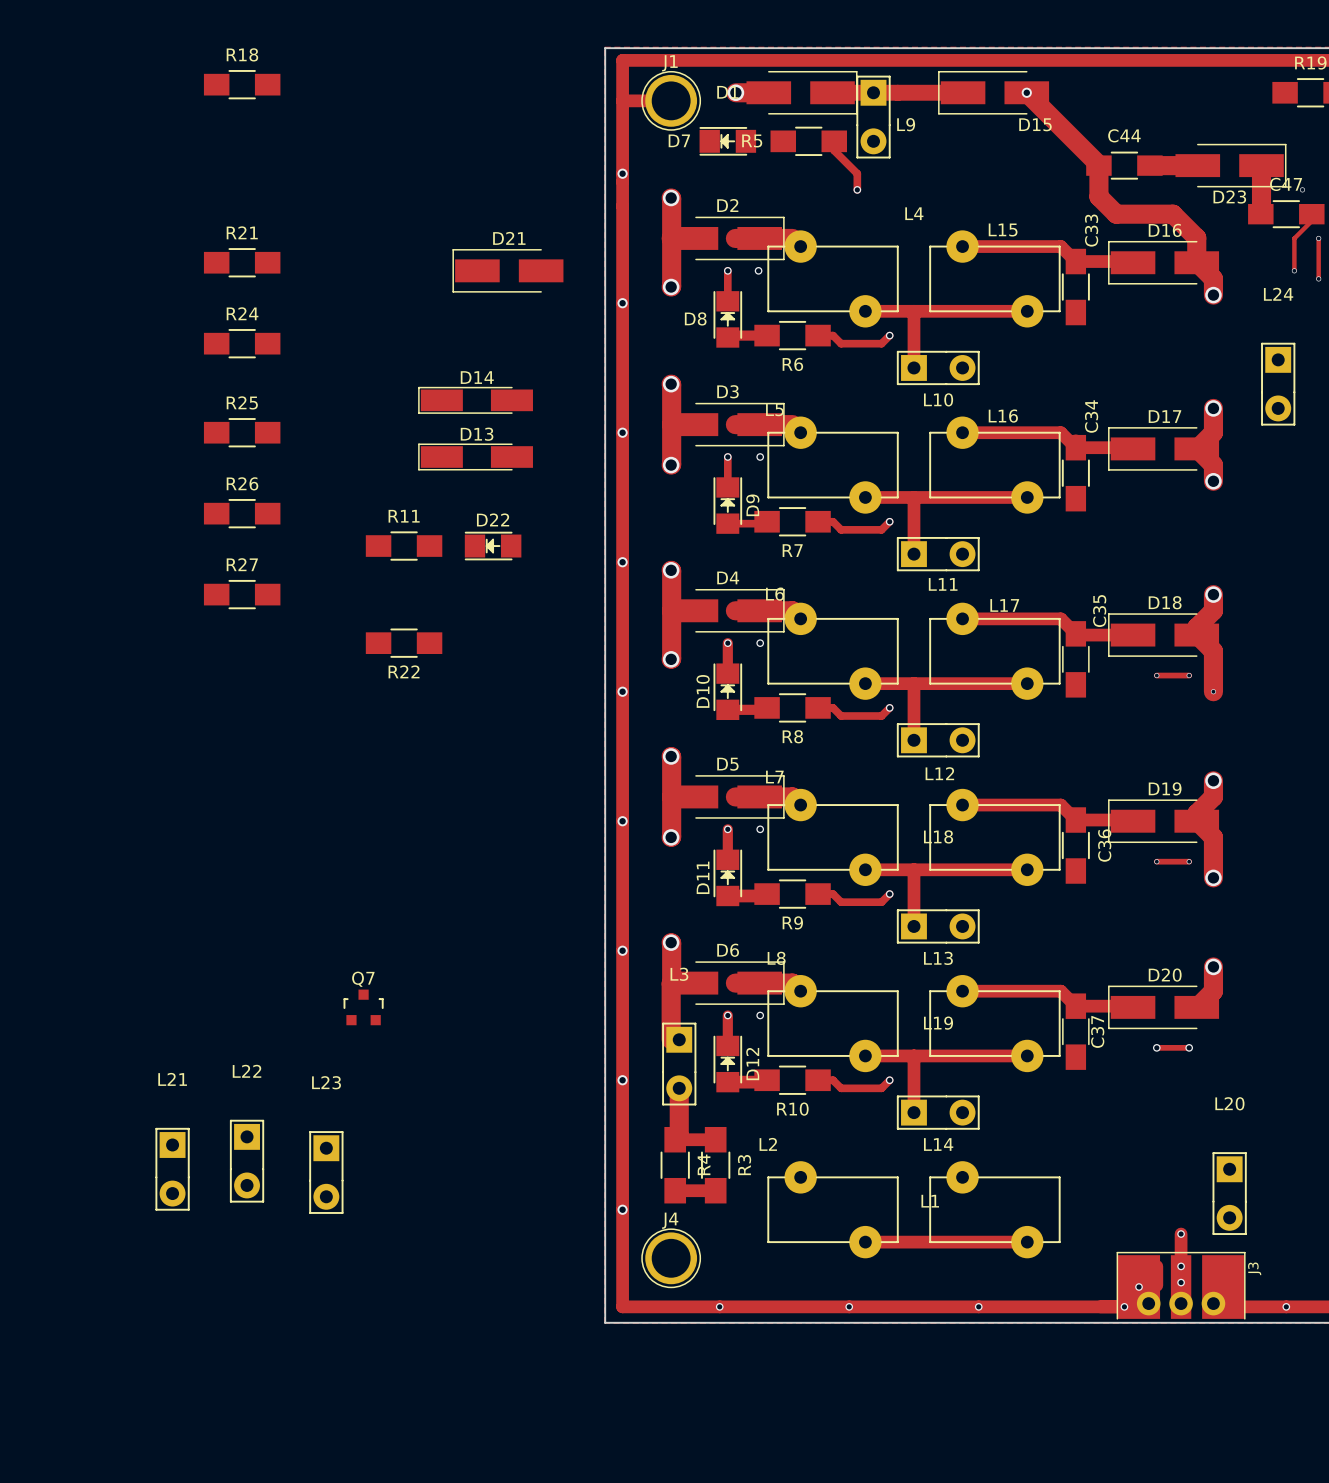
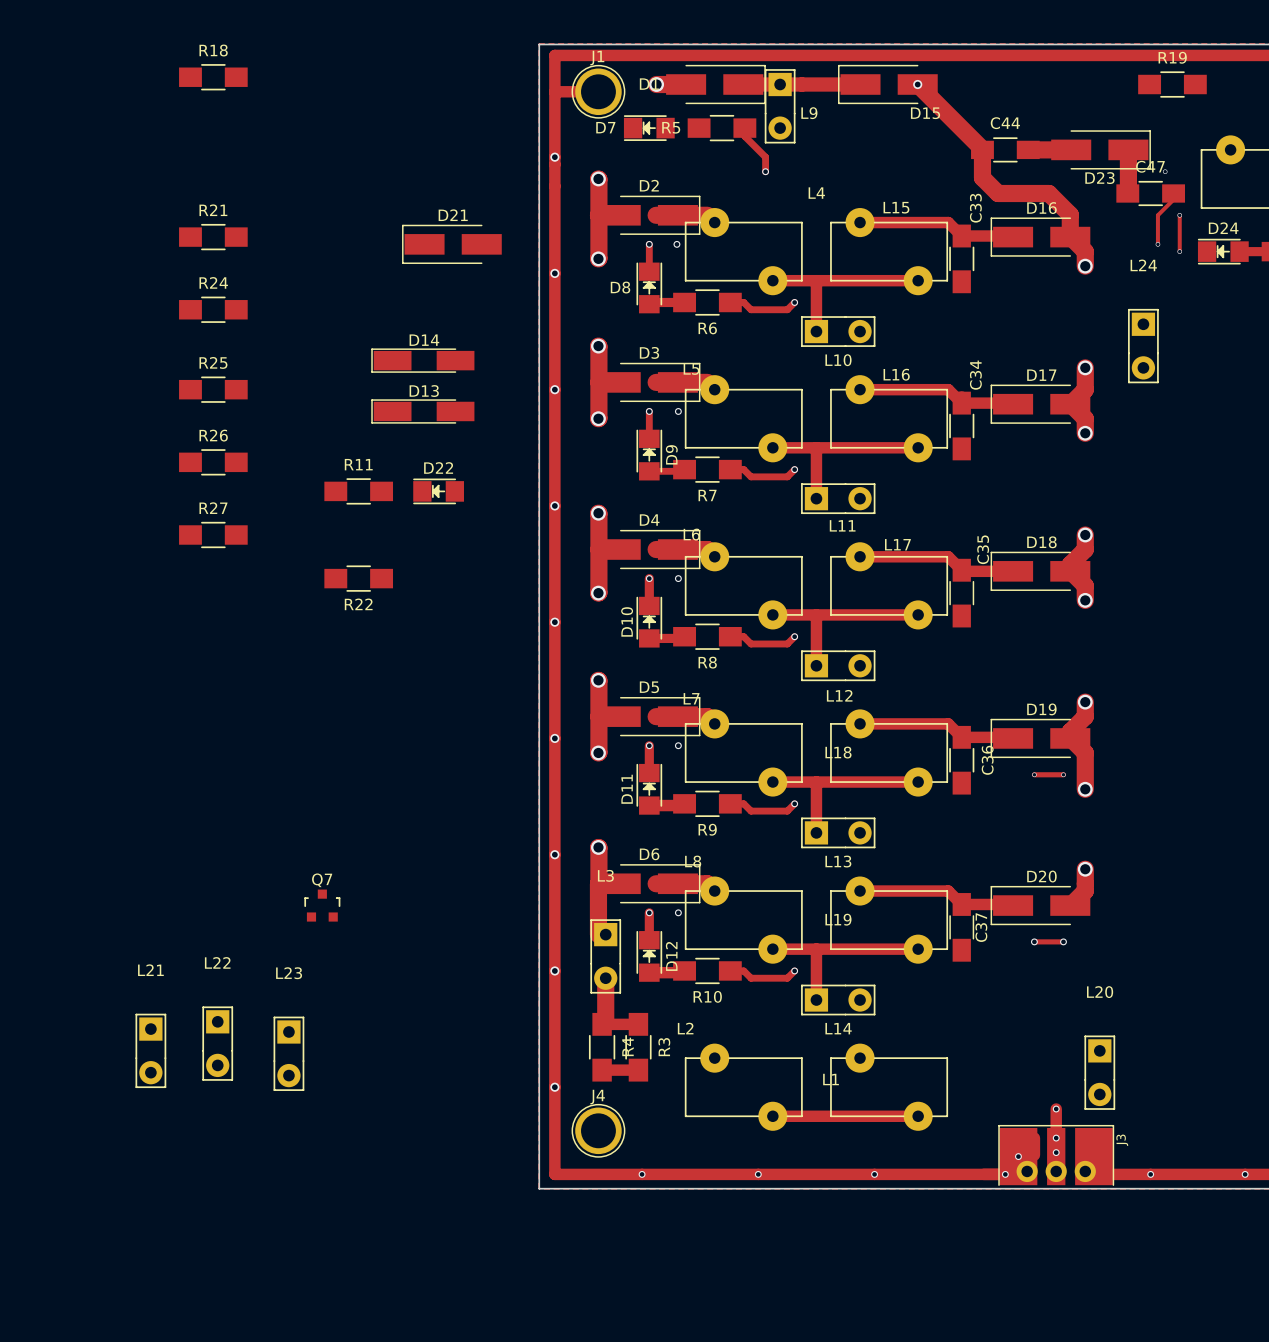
track: (1213, 667) (1213, 691) -> none
via: none -> (1085, 600)
track: (1156, 675) (1189, 675) -> none
via: (1156, 675) -> none
via: (1189, 675) -> none
via: (1213, 691) -> none

